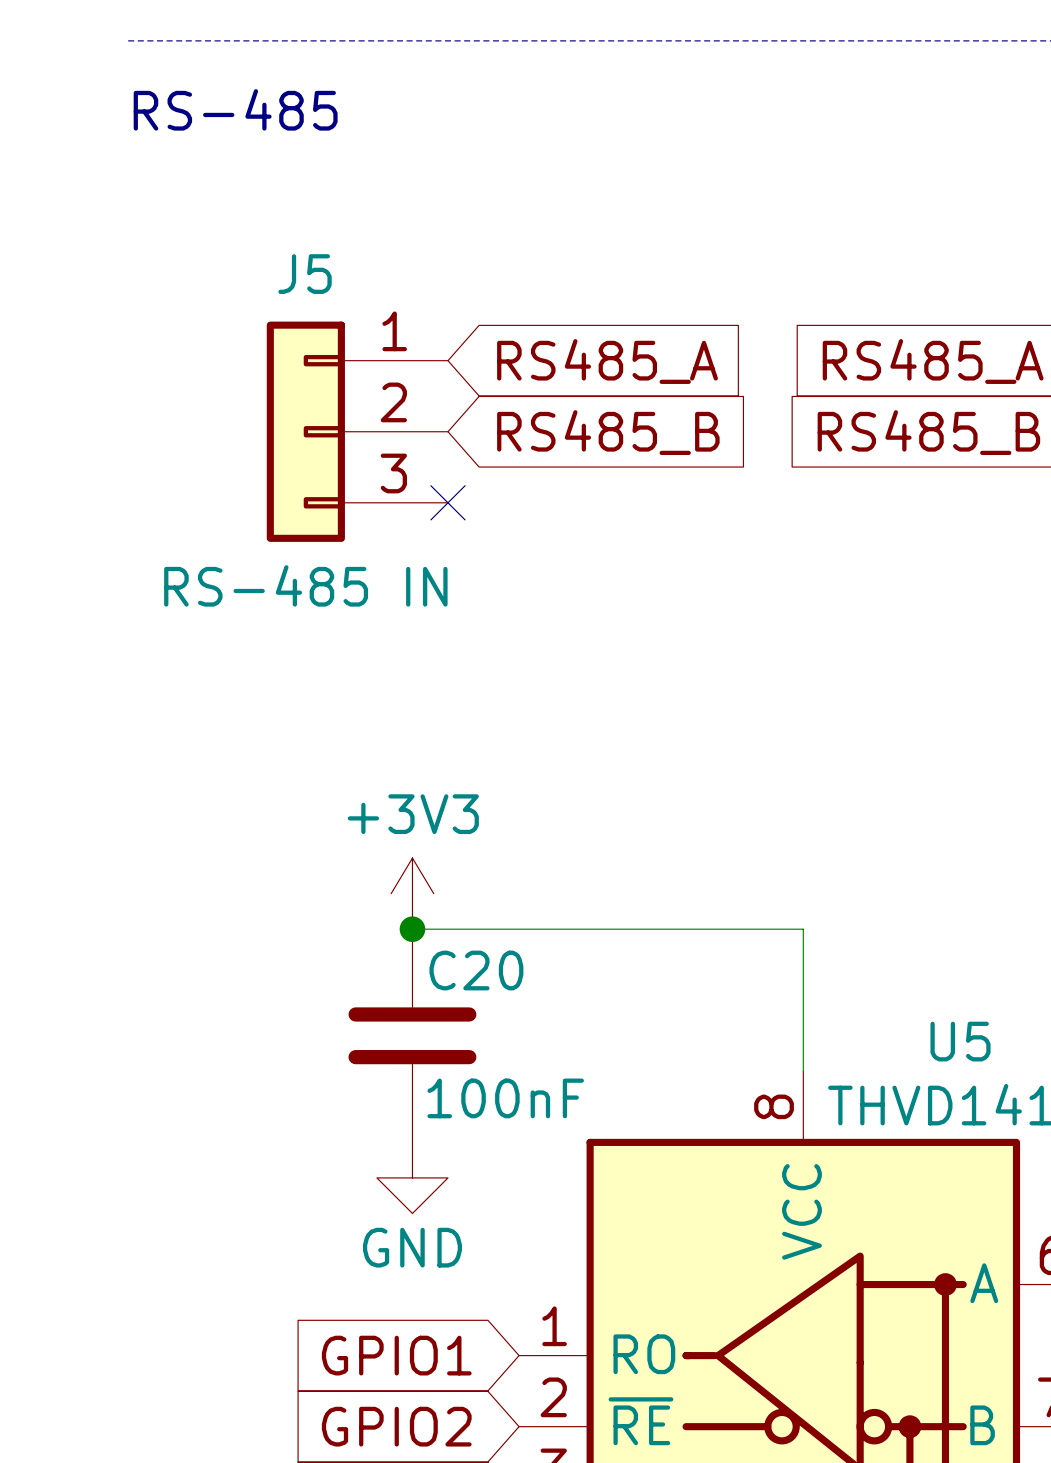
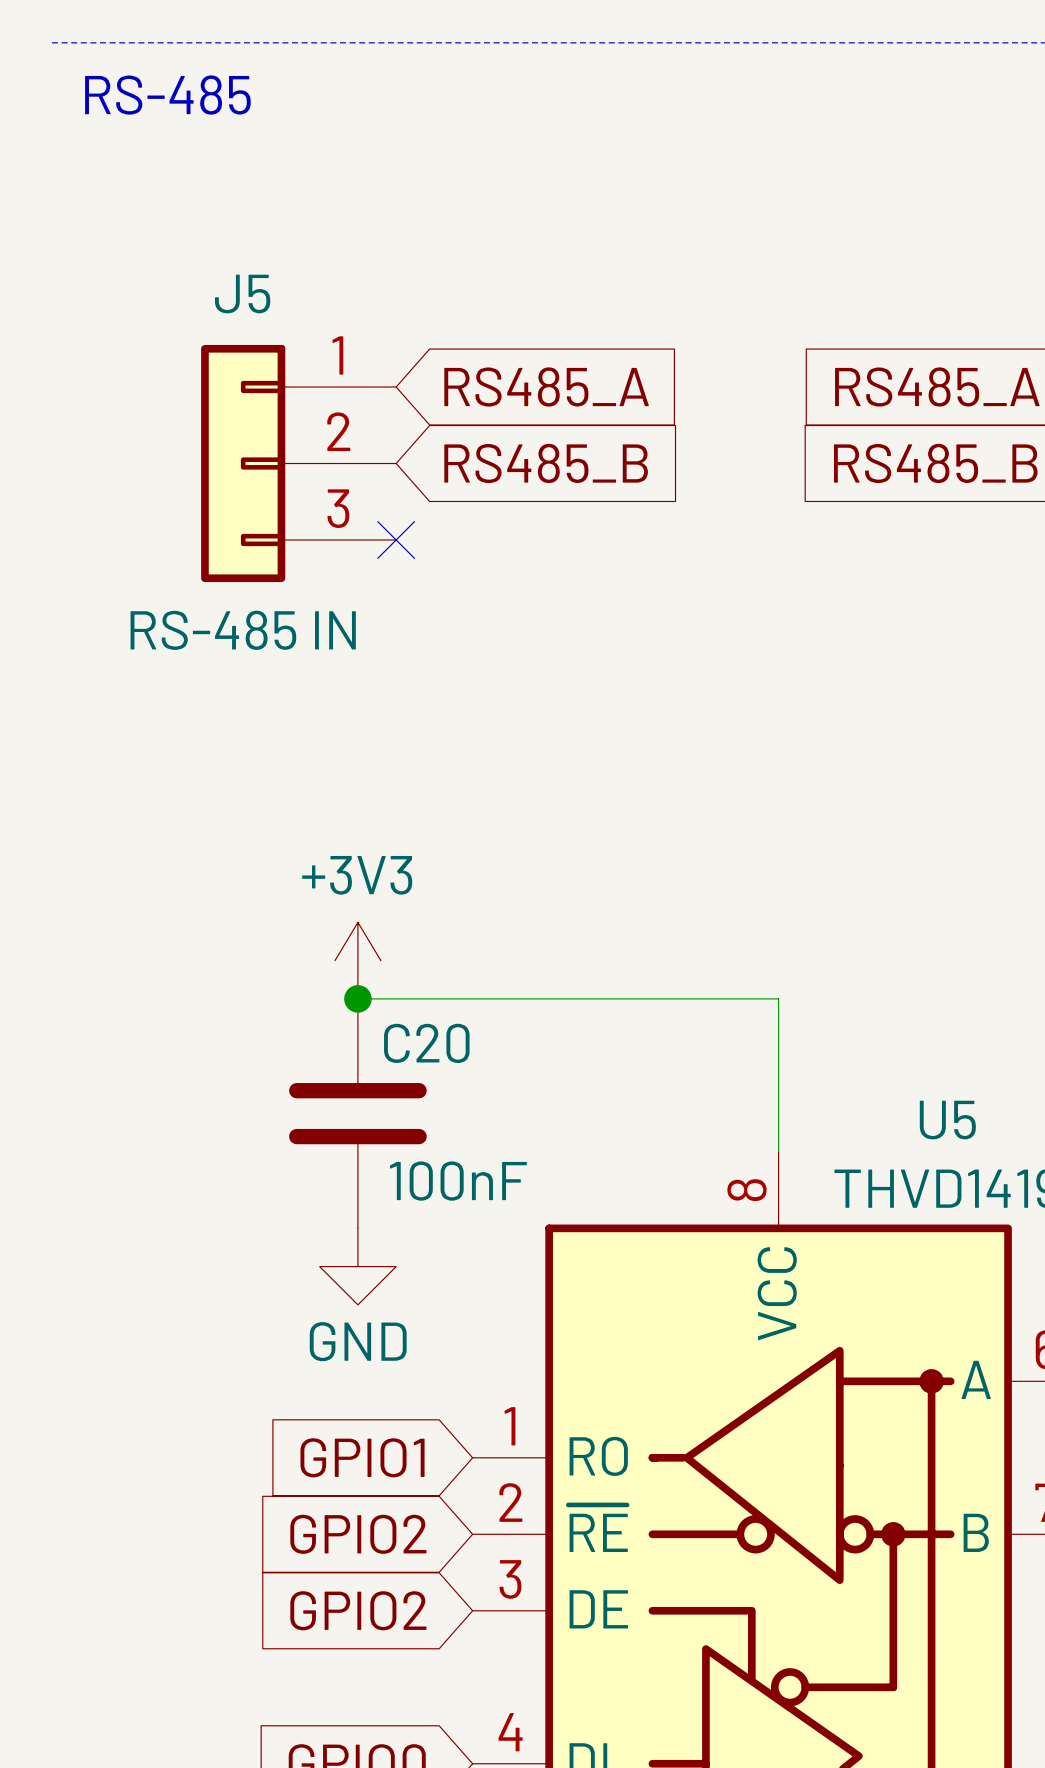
text position: RS-485 (235, 109) -> RS-485 (167, 95)

